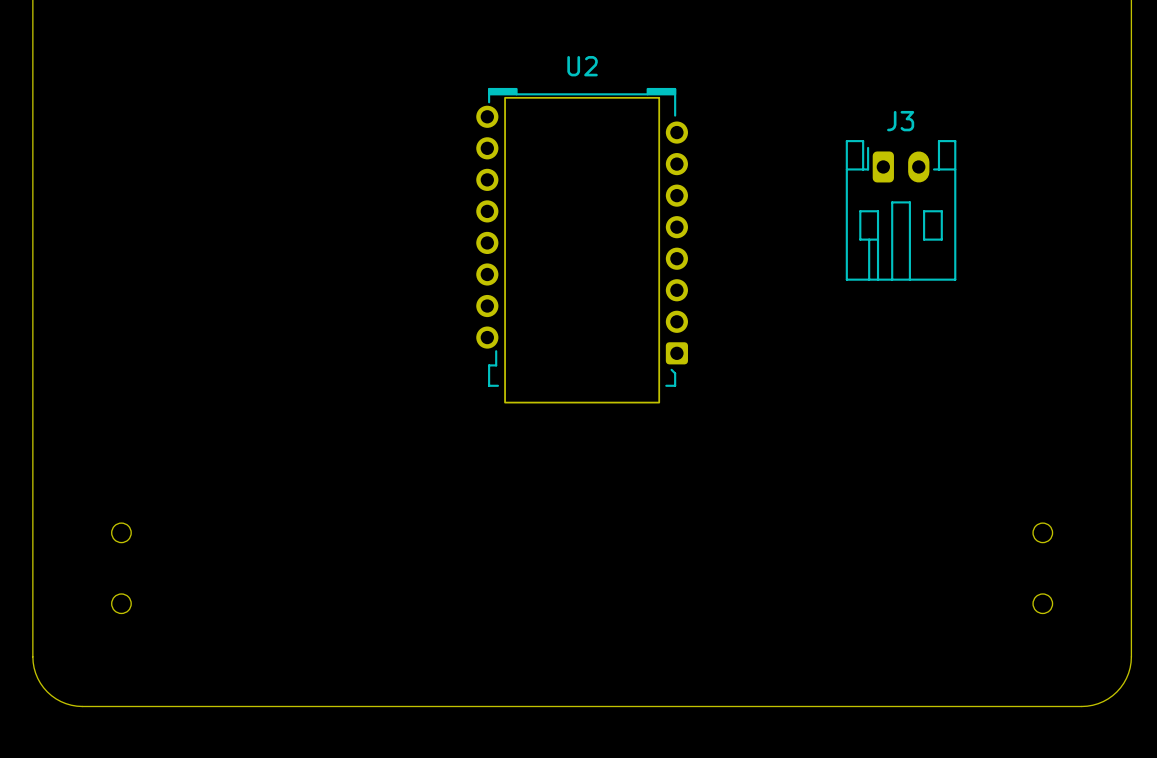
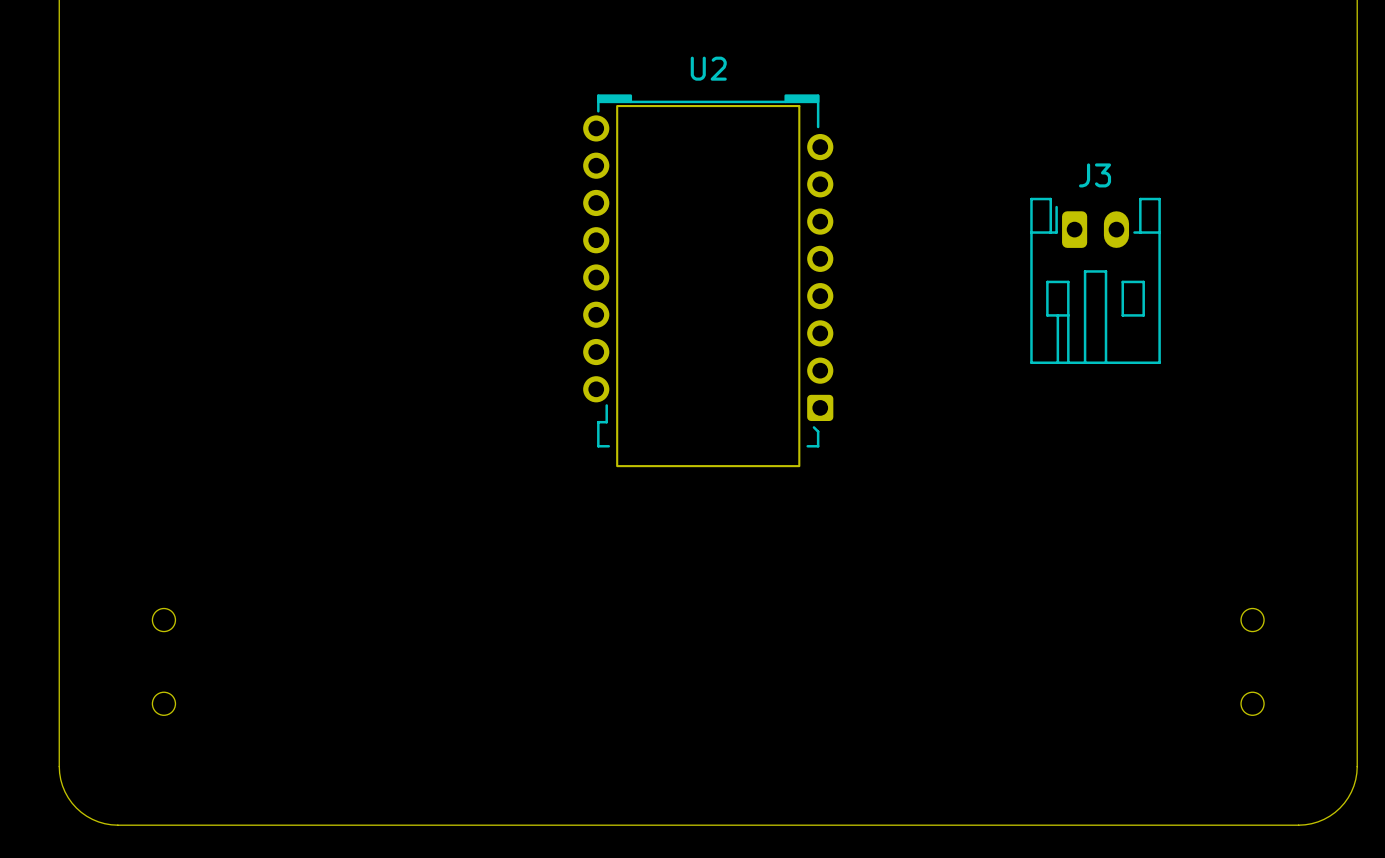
J3 position: (901, 210) -> (1095, 280)

